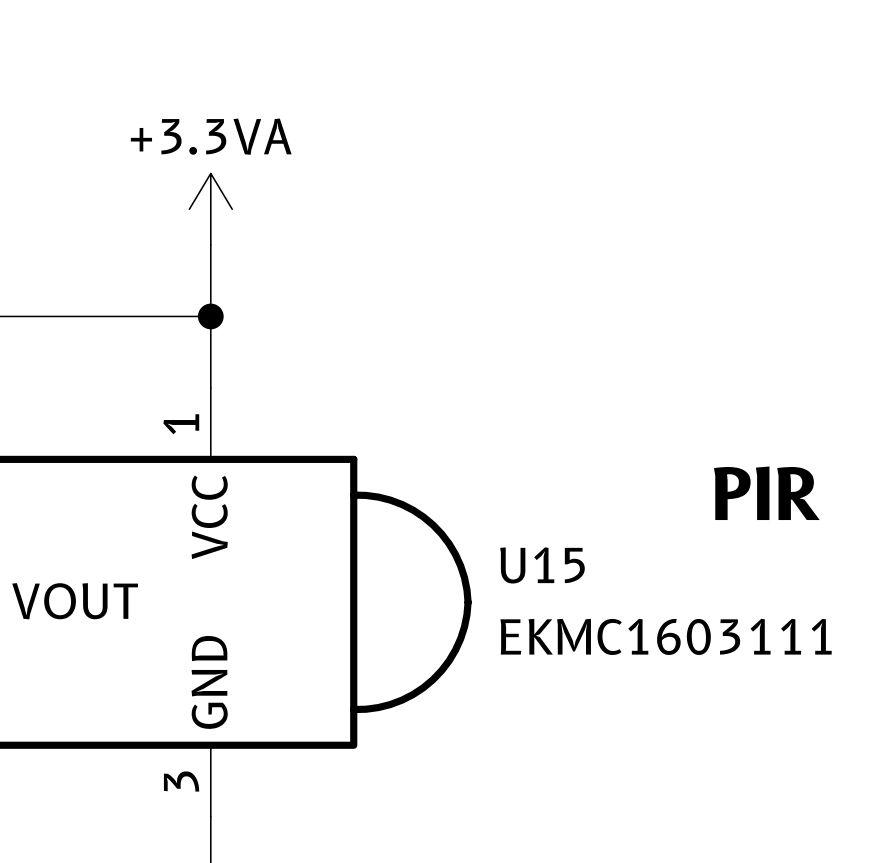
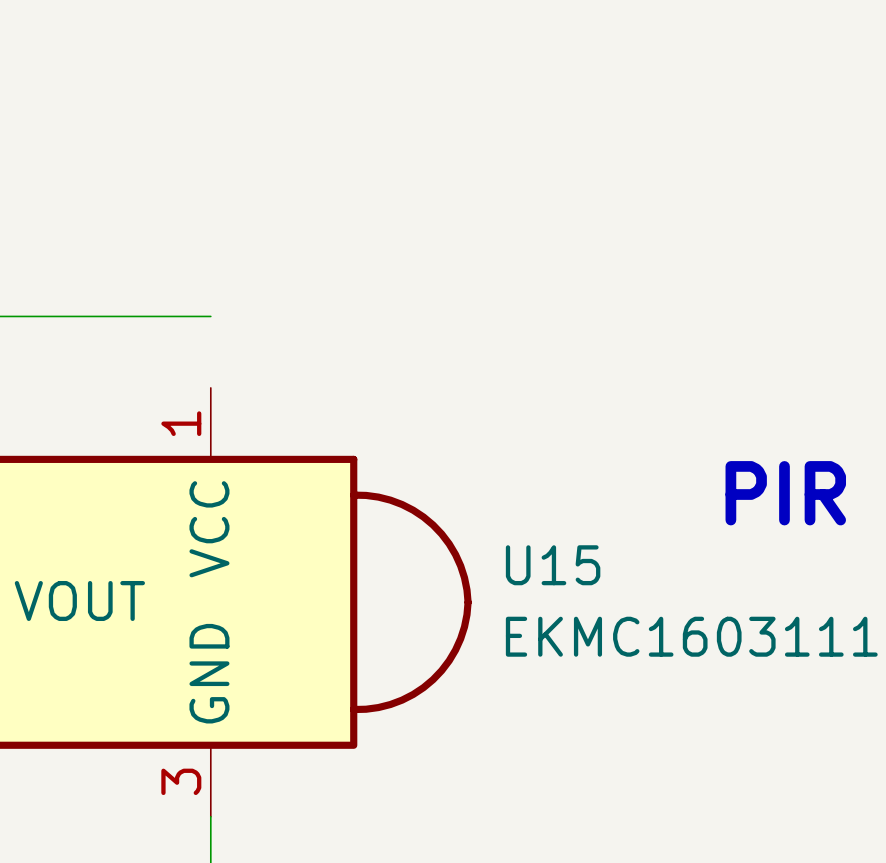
power symbol: +3.3VA (210, 209) -> none
wire: (210, 244) (210, 387) -> none
junction: (210, 316) -> none

